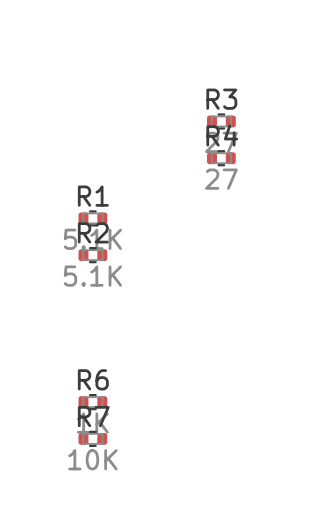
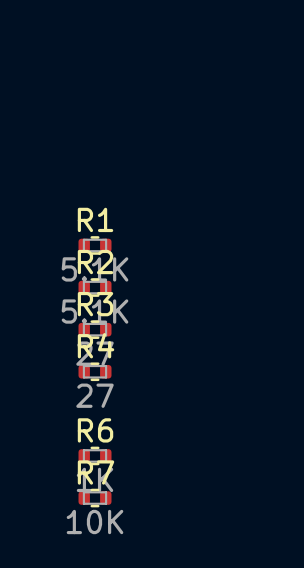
R3 position: (221, 121) -> (95, 329)
R4 position: (221, 158) -> (95, 371)

